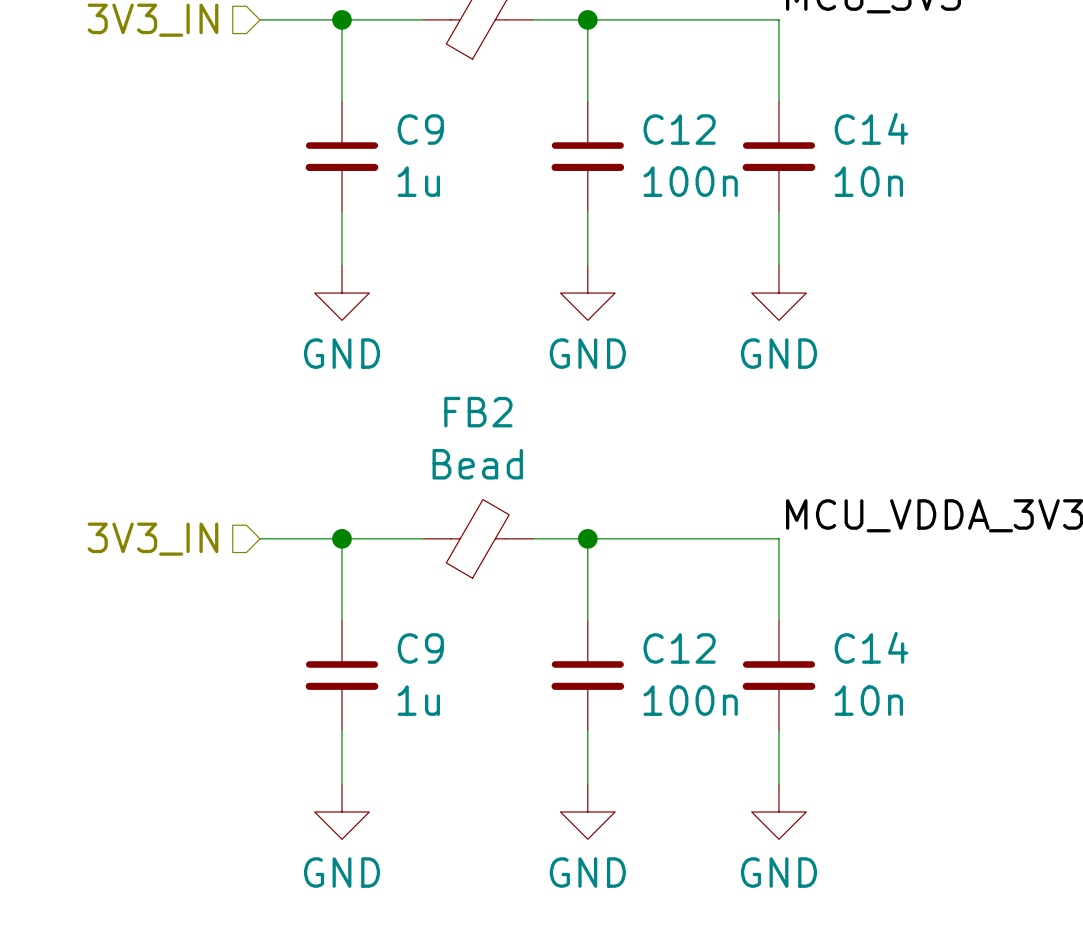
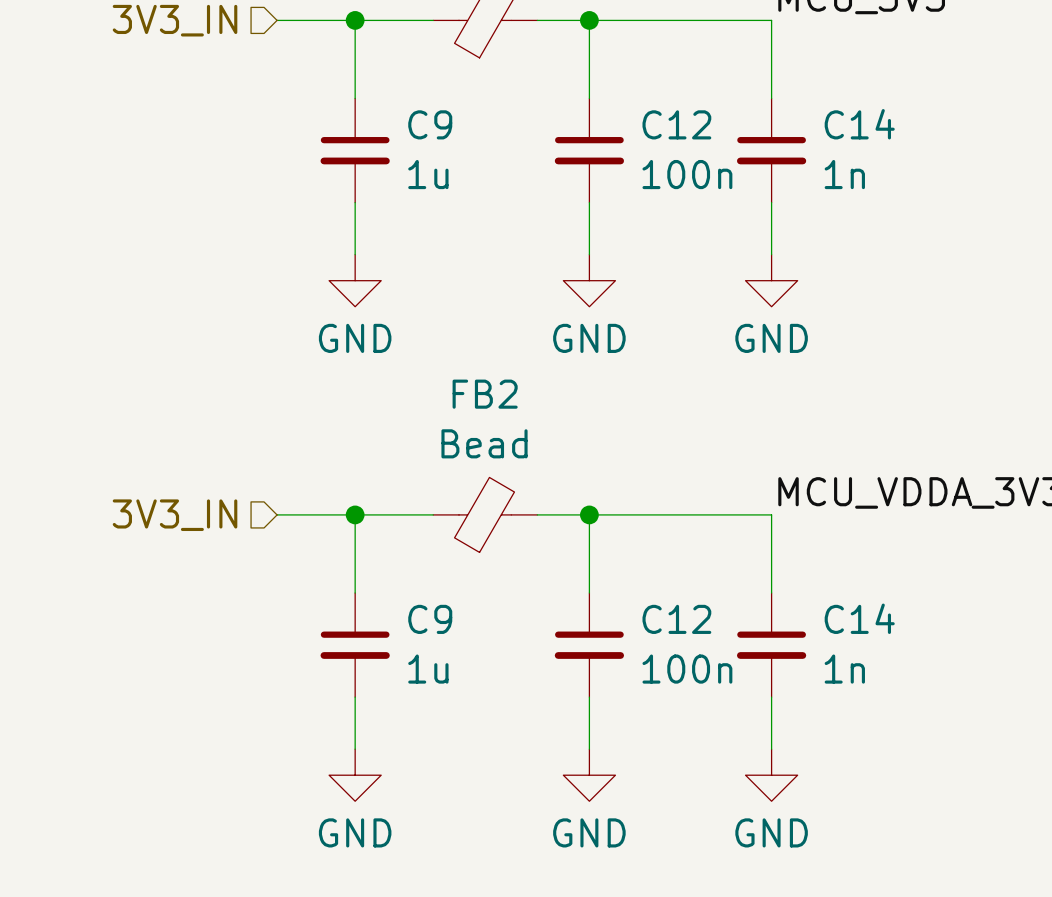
C14 value: 10n (868, 181) -> 1n (844, 174)
C14 value: 10n (868, 700) -> 1n (844, 669)

